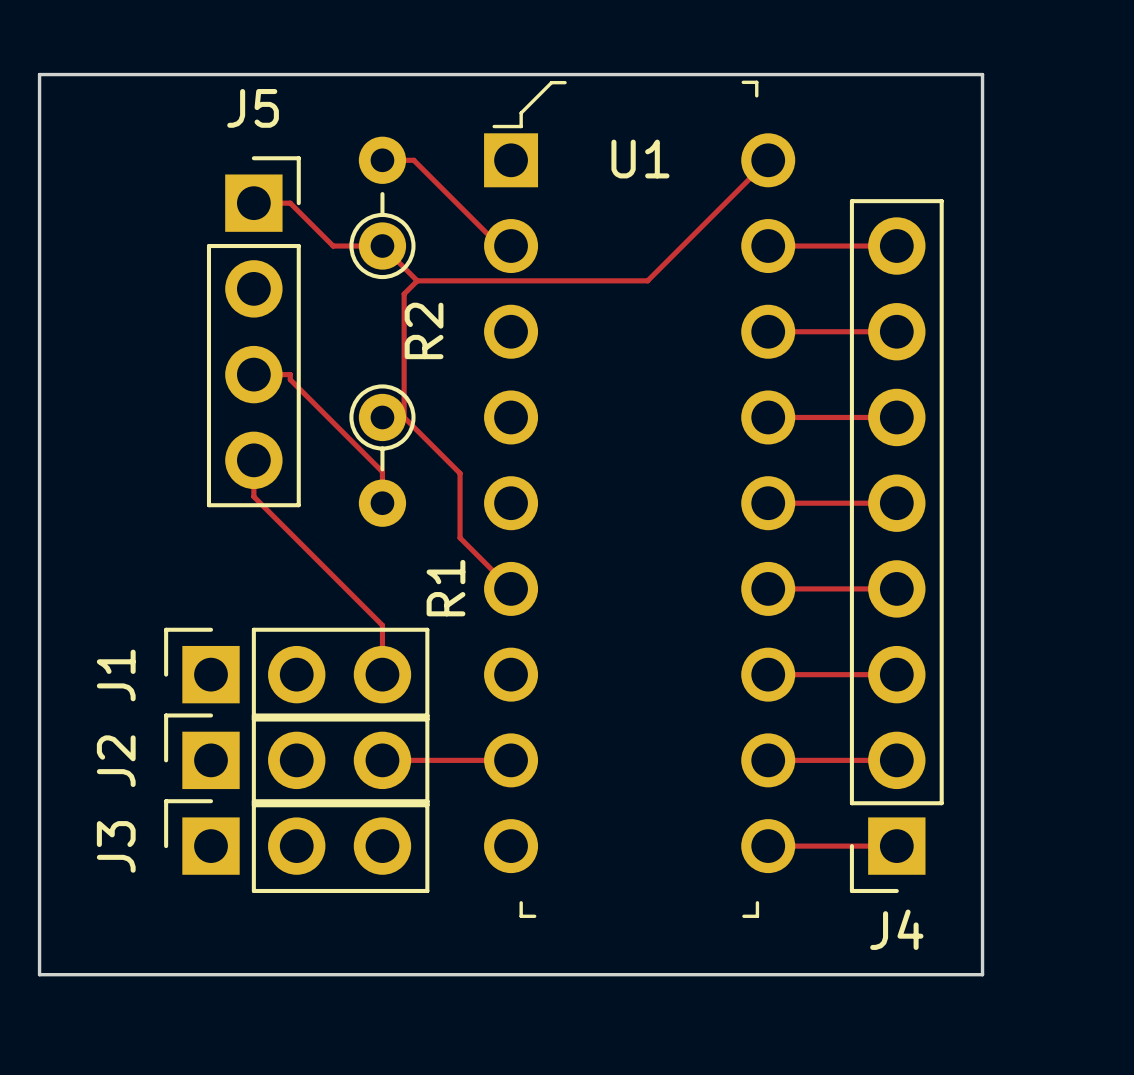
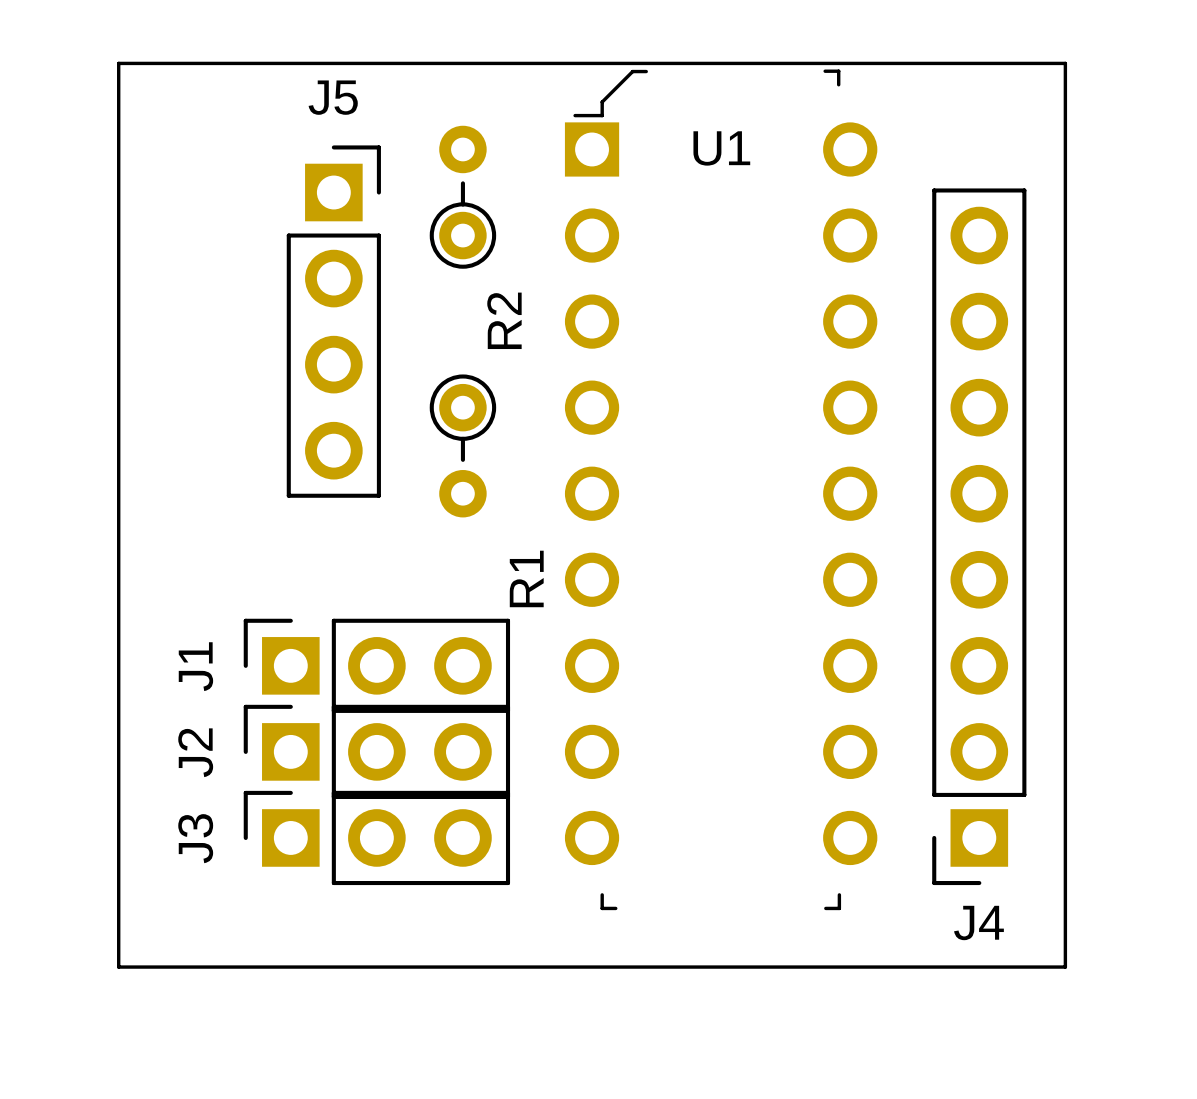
track: (382, 160) (413, 160) (499, 246) (511, 246) -> none
track: (768, 160) (647, 280) (417, 280) -> none
track: (253, 203) (290, 203) (333, 246) (382, 246) (417, 280) -> none
track: (768, 246) (896, 246) -> none
track: (417, 280) (404, 293) (404, 417) -> none
track: (768, 331) (896, 331) -> none
track: (253, 374) (290, 374) (290, 379) (382, 471) (382, 503) -> none
track: (404, 417) (460, 473) (460, 537) (511, 588) -> none
track: (768, 417) (896, 417) -> none
track: (253, 460) (253, 496) (382, 625) (382, 674) -> none
track: (768, 503) (896, 503) -> none
track: (768, 588) (896, 588) -> none
track: (768, 674) (896, 674) -> none
track: (382, 760) (511, 760) -> none
track: (768, 760) (896, 760) -> none
track: (768, 846) (896, 846) -> none

